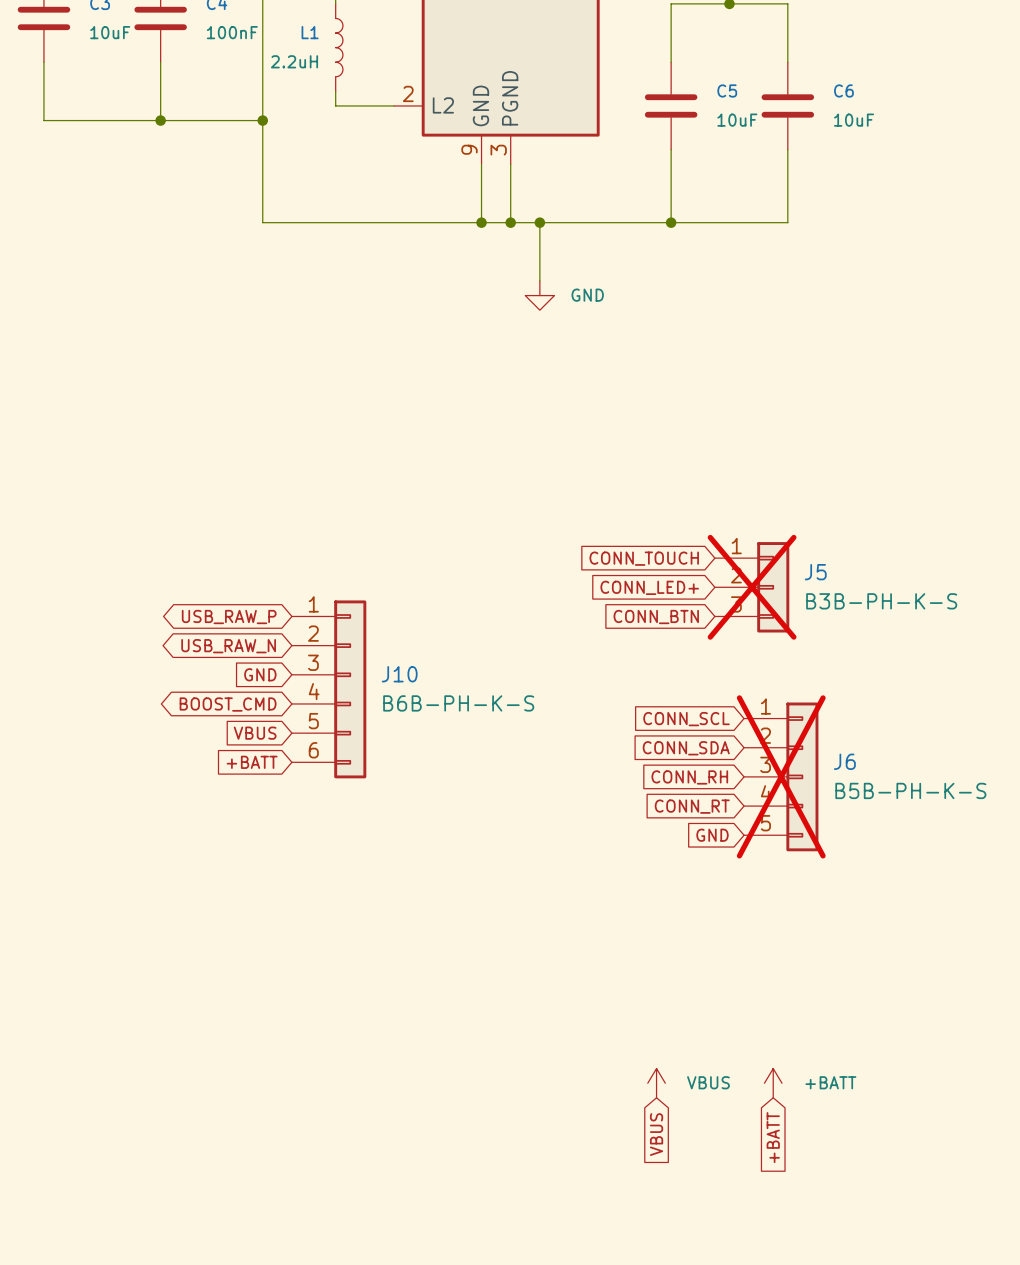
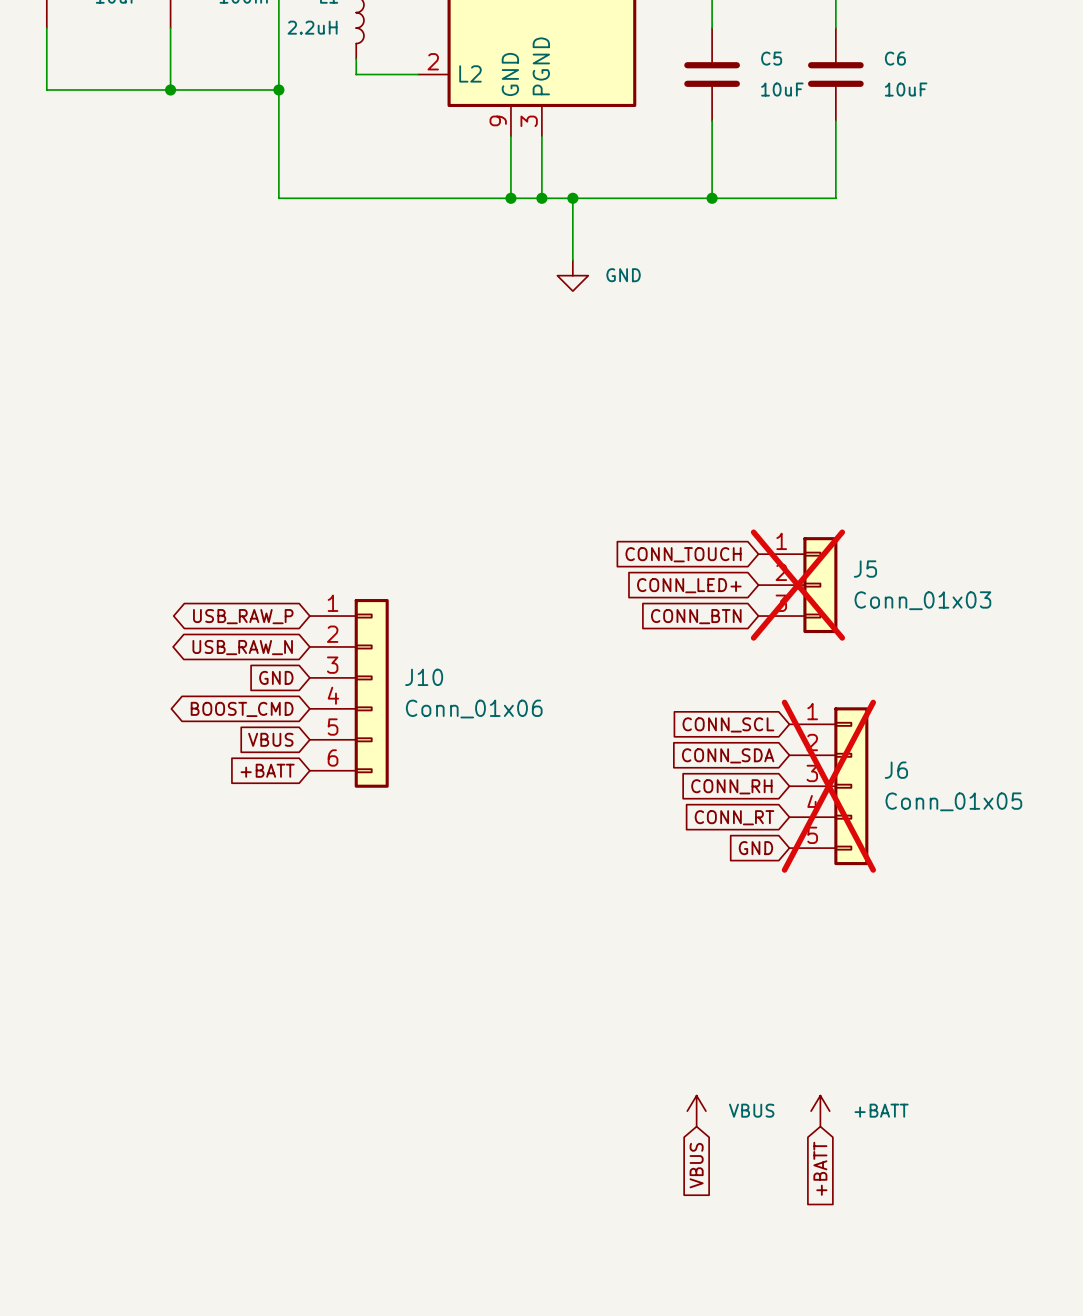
J5 value: B3B-PH-K-S (881, 601) -> Conn_01x03 (922, 600)
J10 value: B6B-PH-K-S (458, 703) -> Conn_01x06 (474, 709)
J6 value: B5B-PH-K-S (910, 790) -> Conn_01x05 (953, 801)

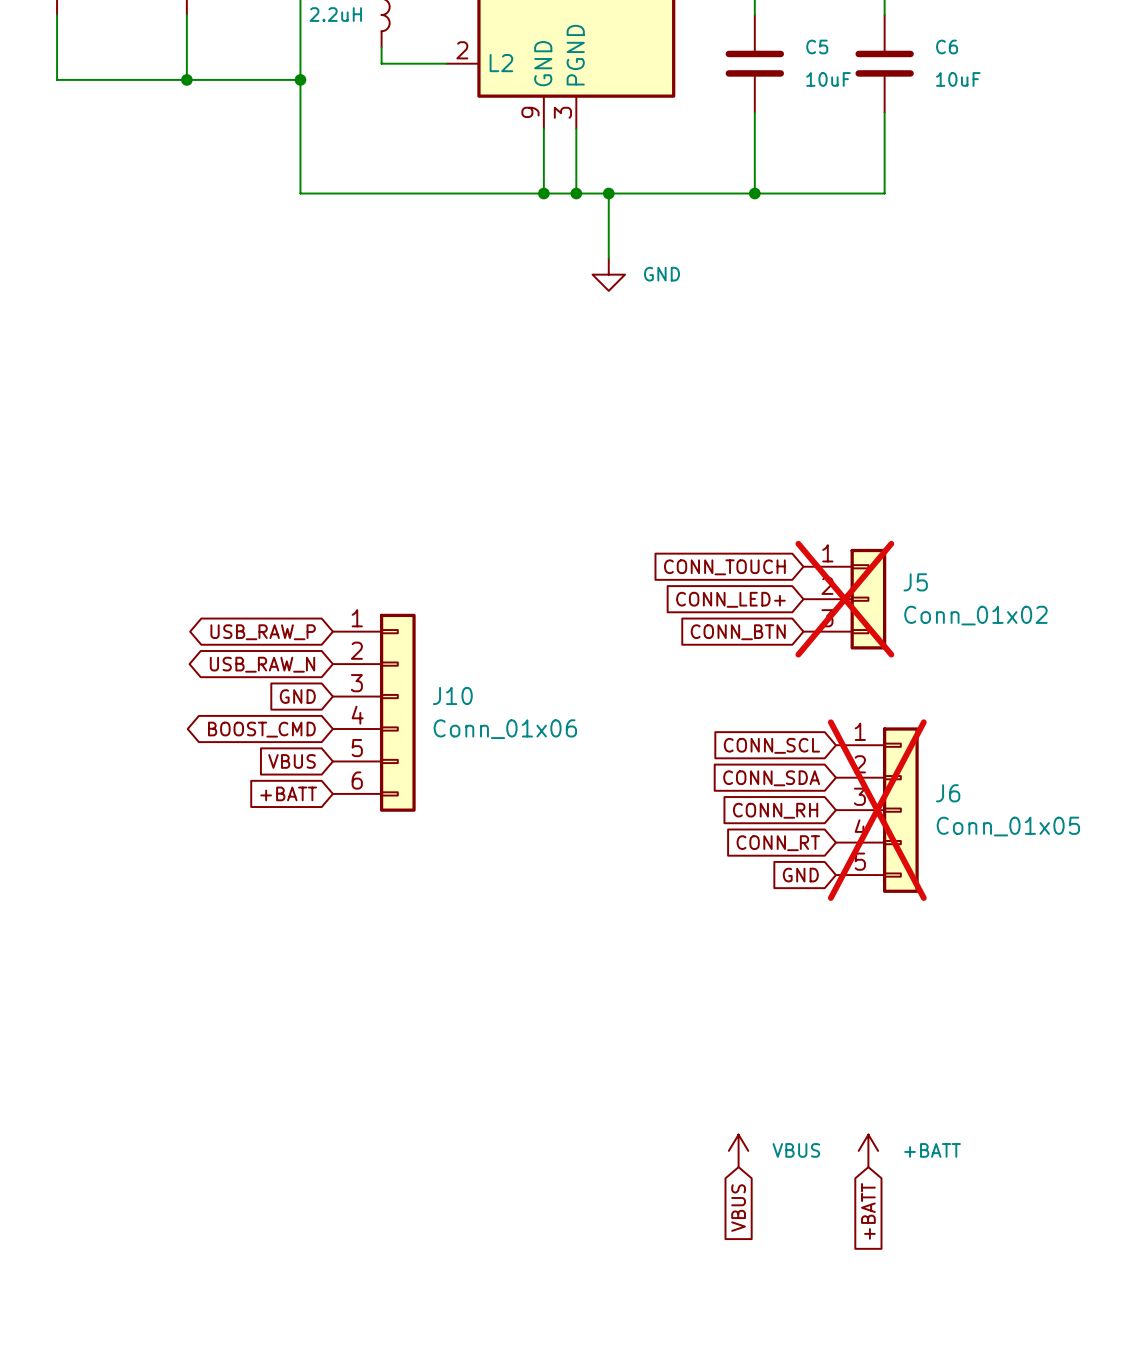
J5 value: Conn_01x03 (922, 600) -> Conn_01x02 (975, 615)

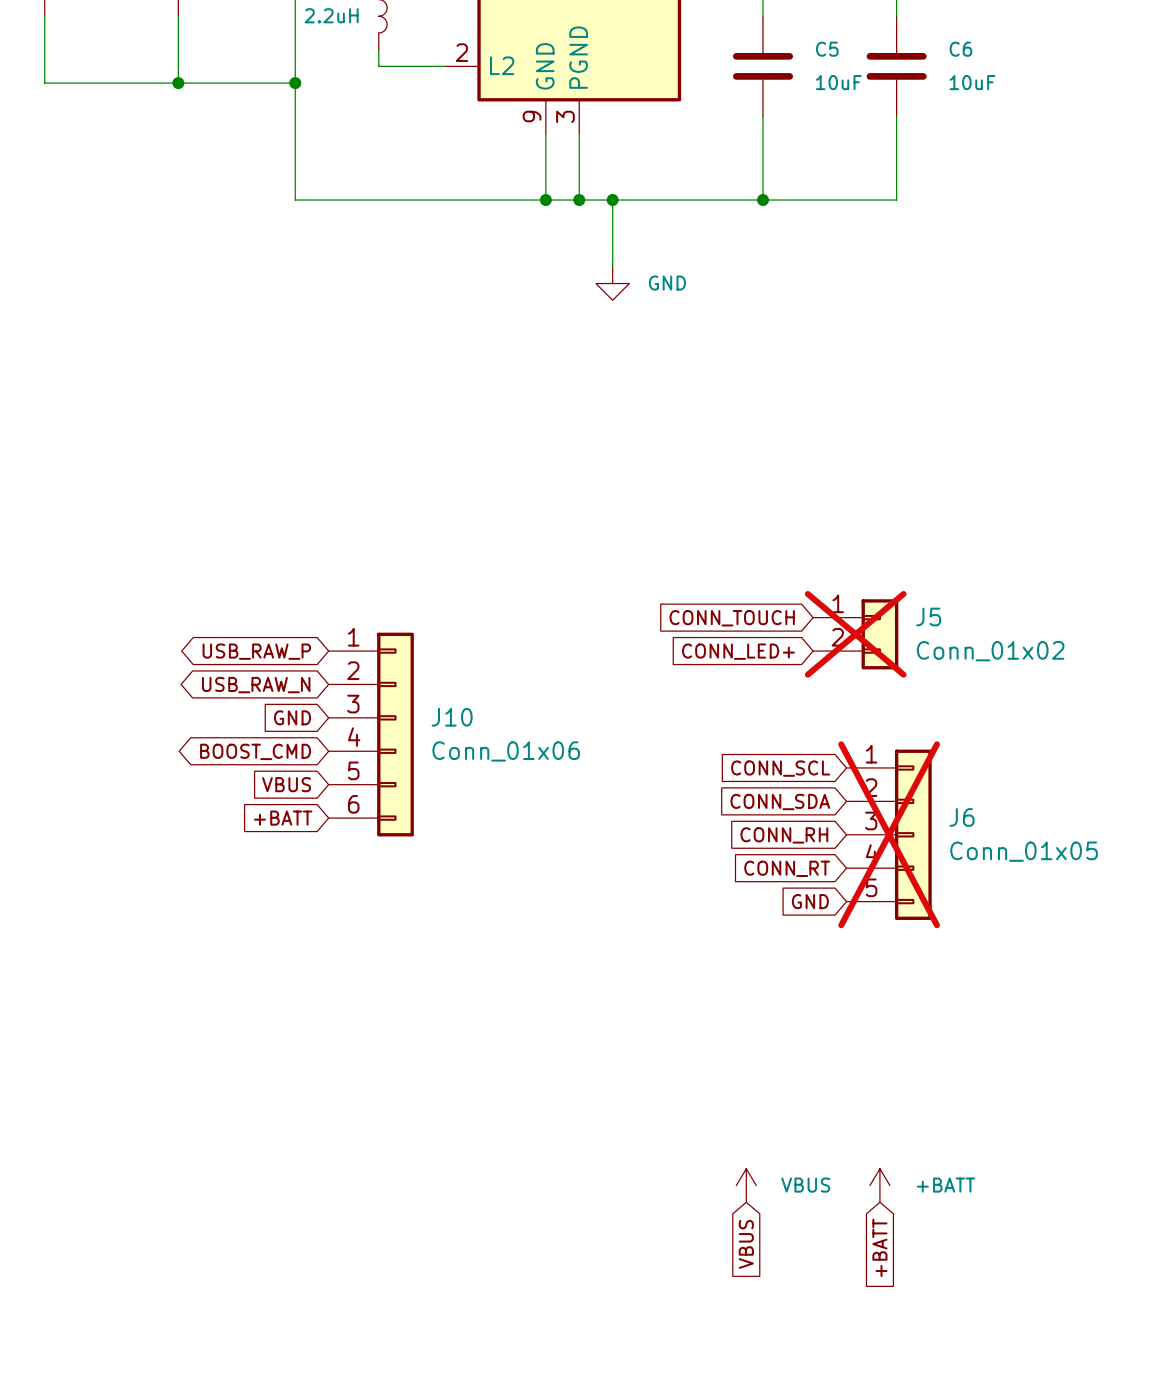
J5 symbol: [803, 548, 887, 650] -> [813, 599, 899, 670]
global label: CONN_TOUCH (724, 567) -> none
global label: CONN_LED+ (730, 599) -> CONN_TOUCH (732, 618)
global label: CONN_BTN (738, 632) -> CONN_LED+ (738, 651)

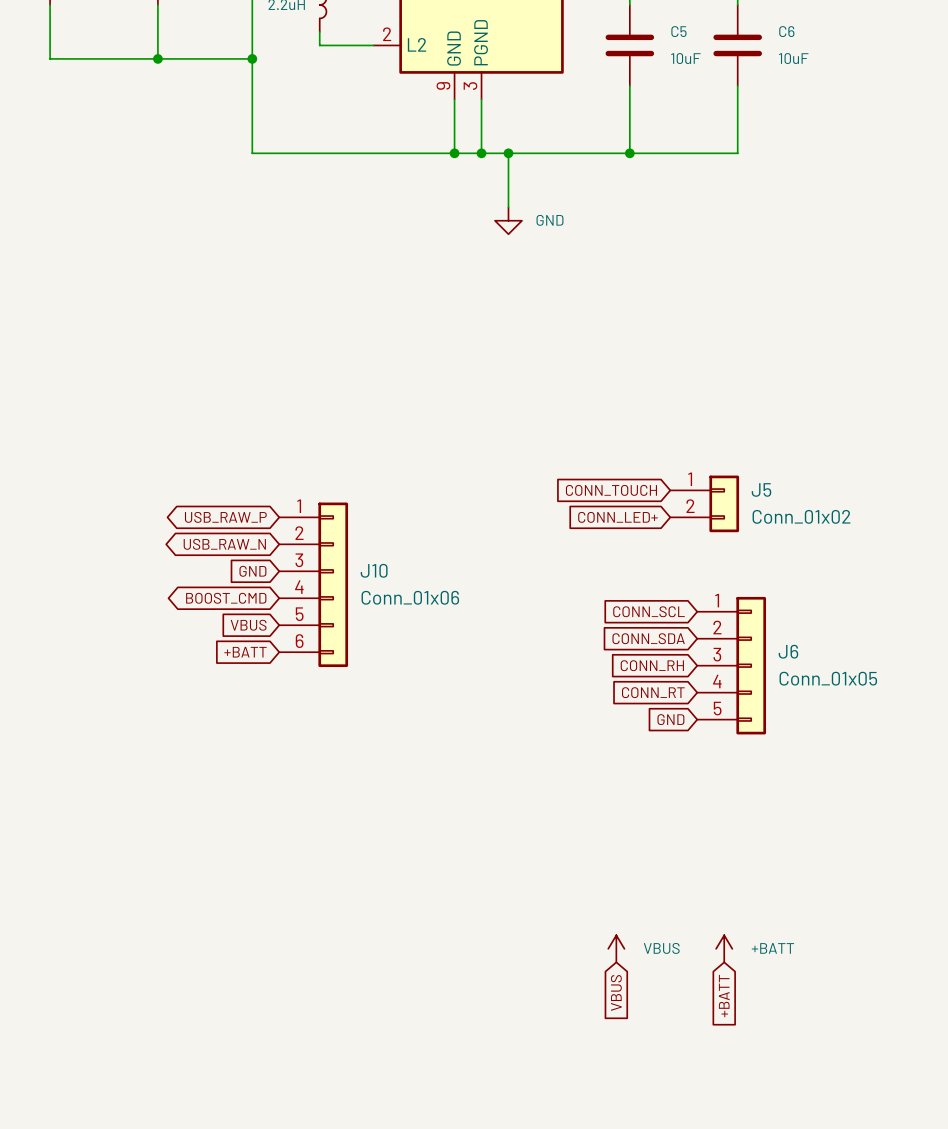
J5 do-not-place cross: (855, 634) -> none
J6 do-not-place cross: (889, 834) -> none

